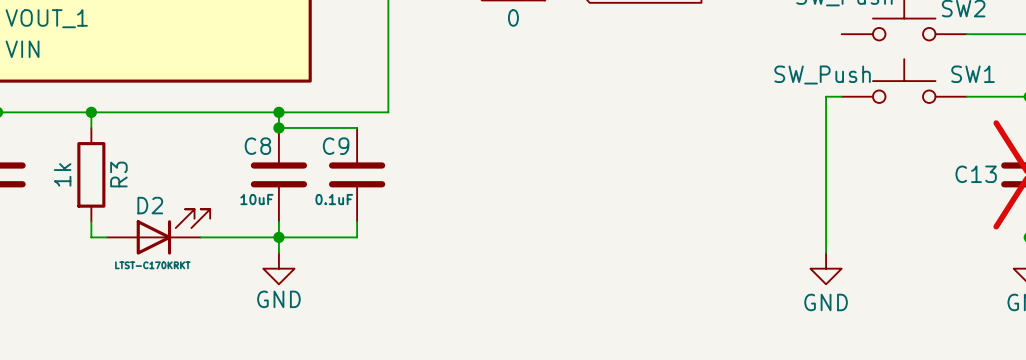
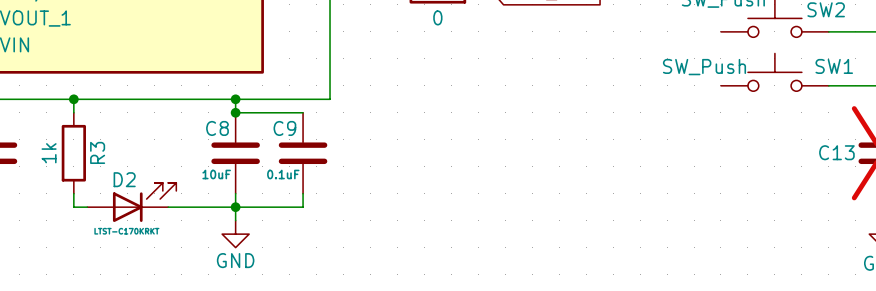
wire: (841, 96) (826, 96) (826, 253) -> none
power symbol: GND (826, 268) -> none

